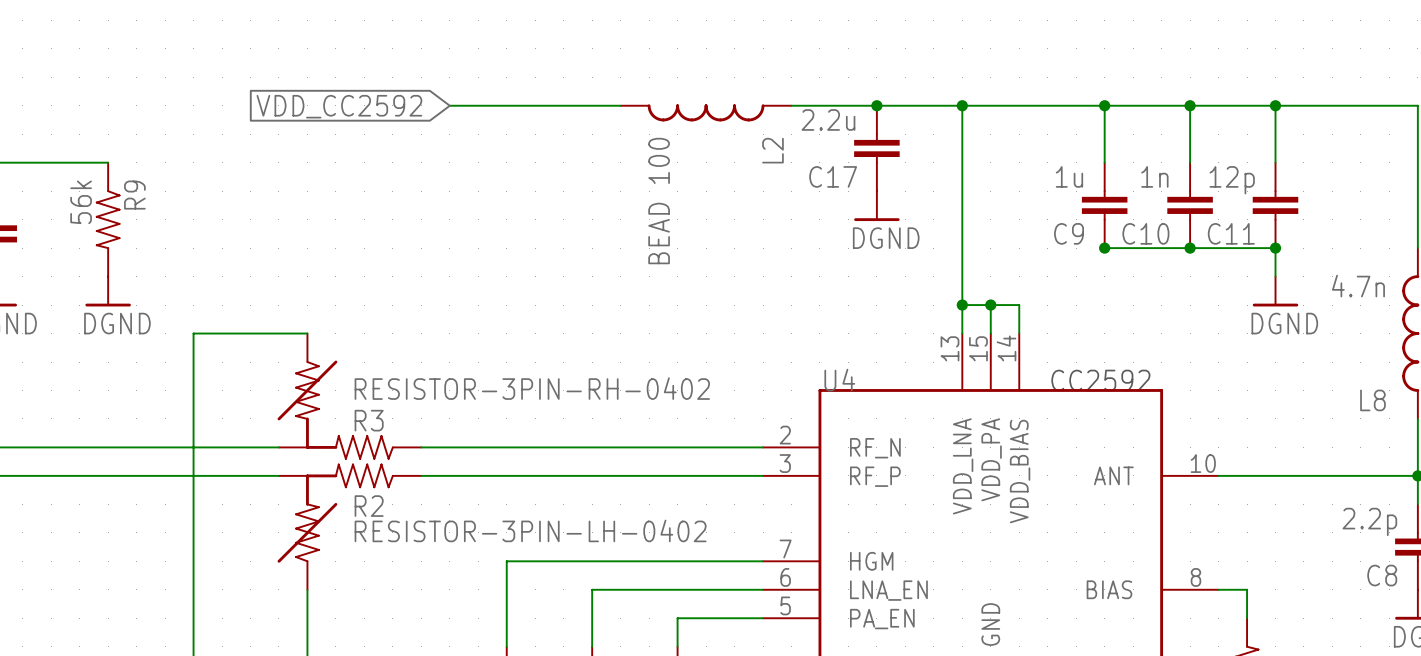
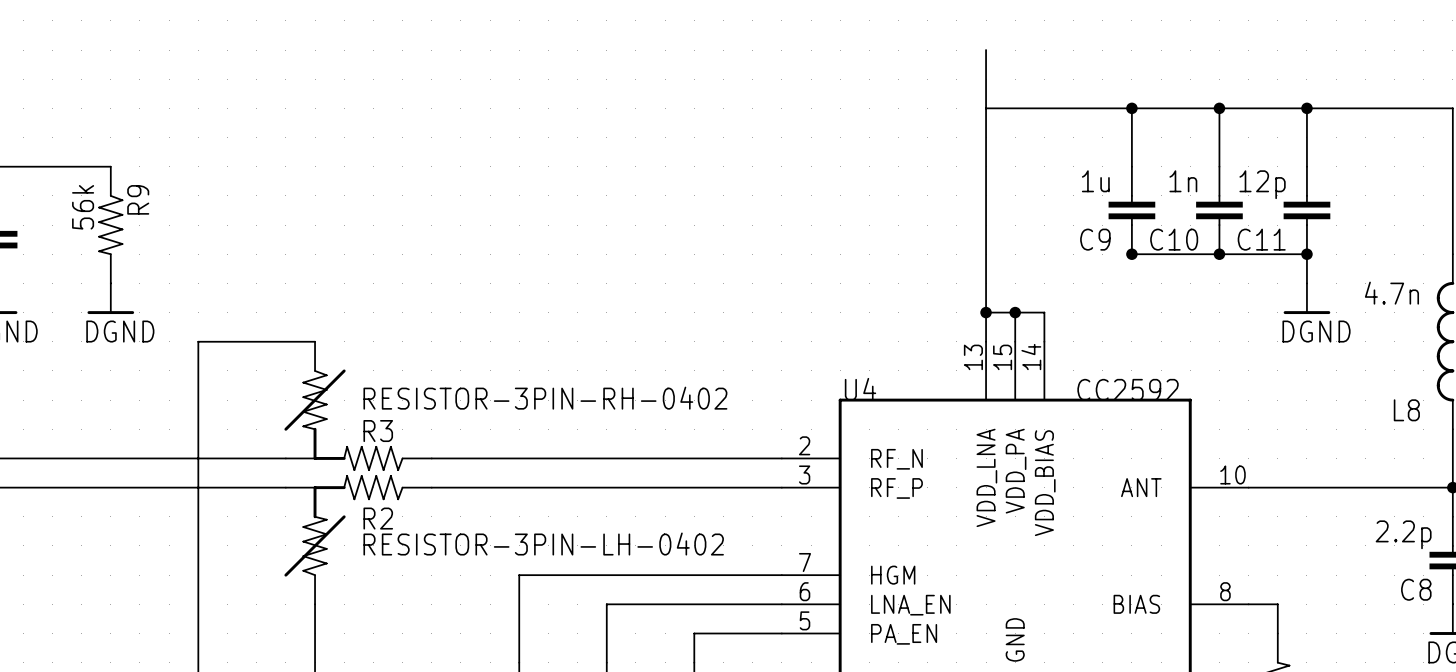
wire: (449, 105) (620, 105) -> none
wire: (791, 105) (962, 105) -> (986, 50) (986, 108)
junction: (876, 105) -> none
junction: (962, 105) -> none
global label: VDD_CC2592 (339, 106) -> none
L2: BEAD 100 (706, 112) -> none
C17: 2.2u (876, 148) -> none
power symbol: DGND (876, 206) -> none

